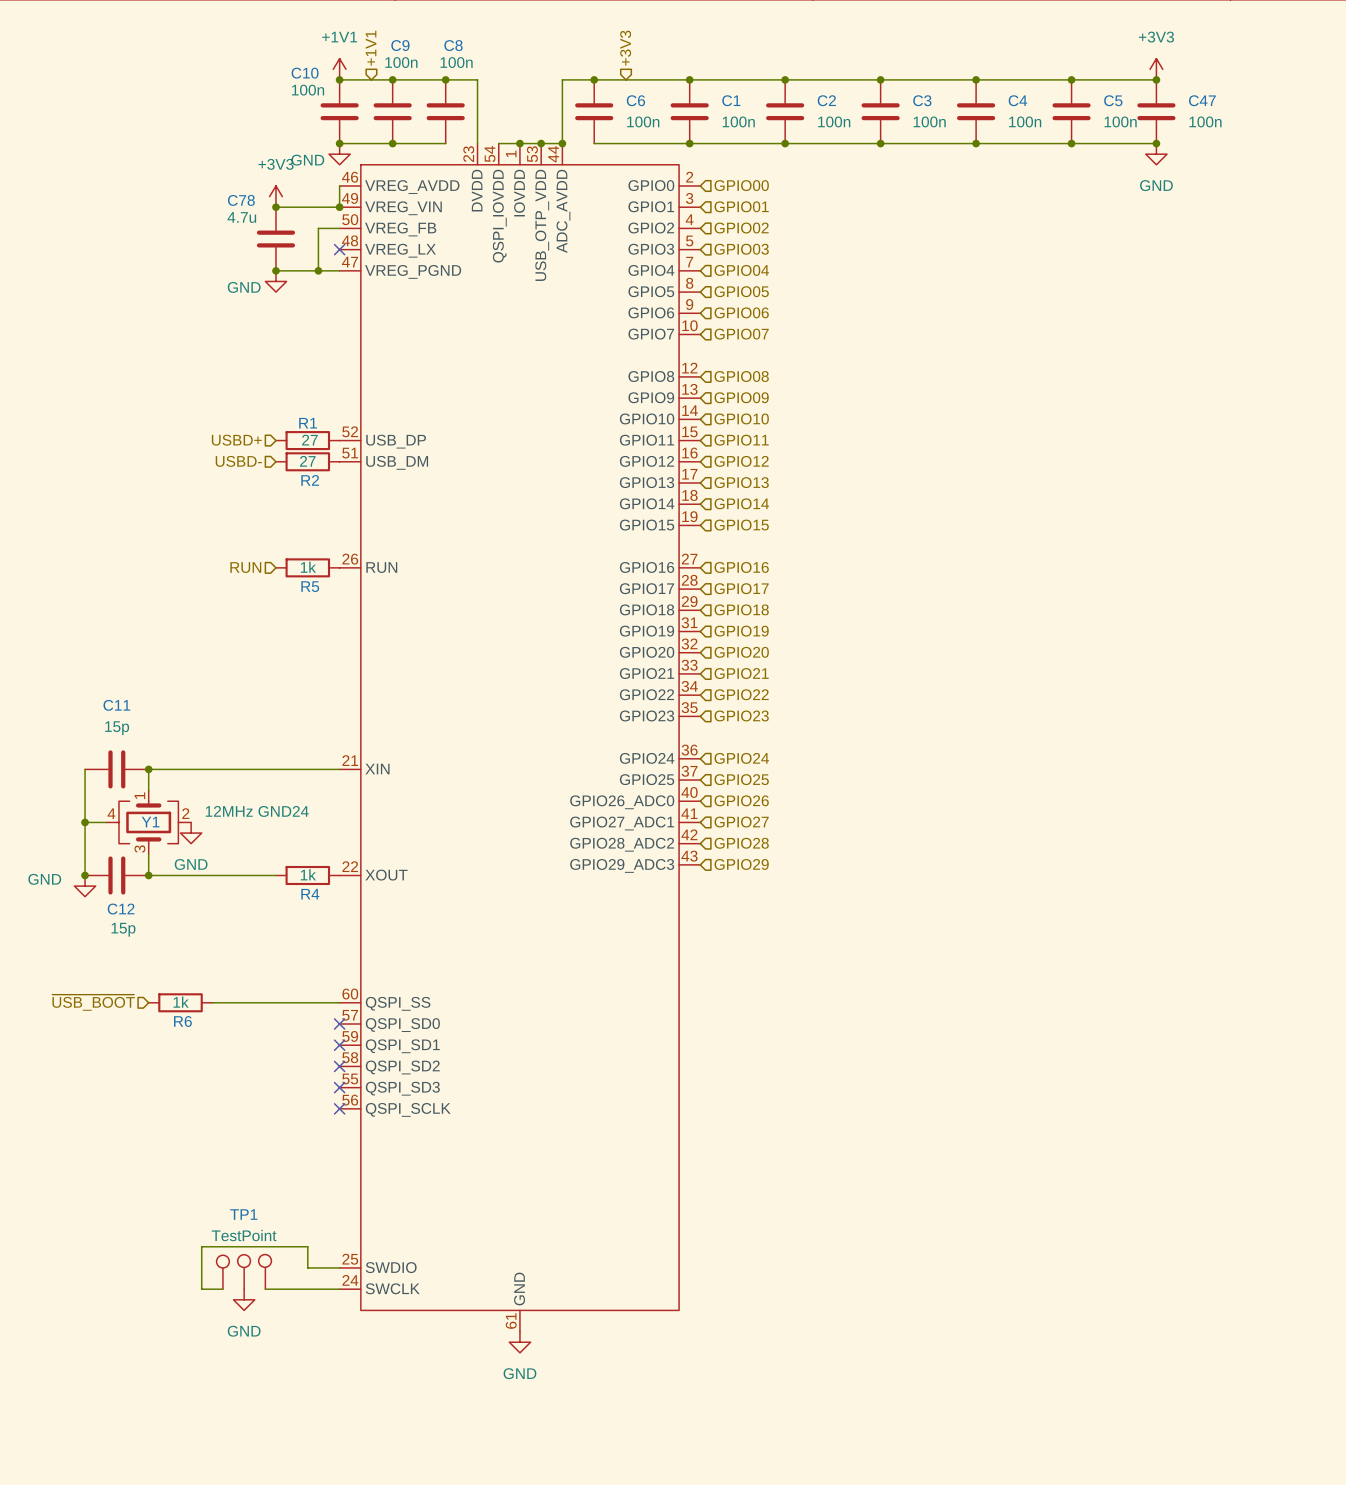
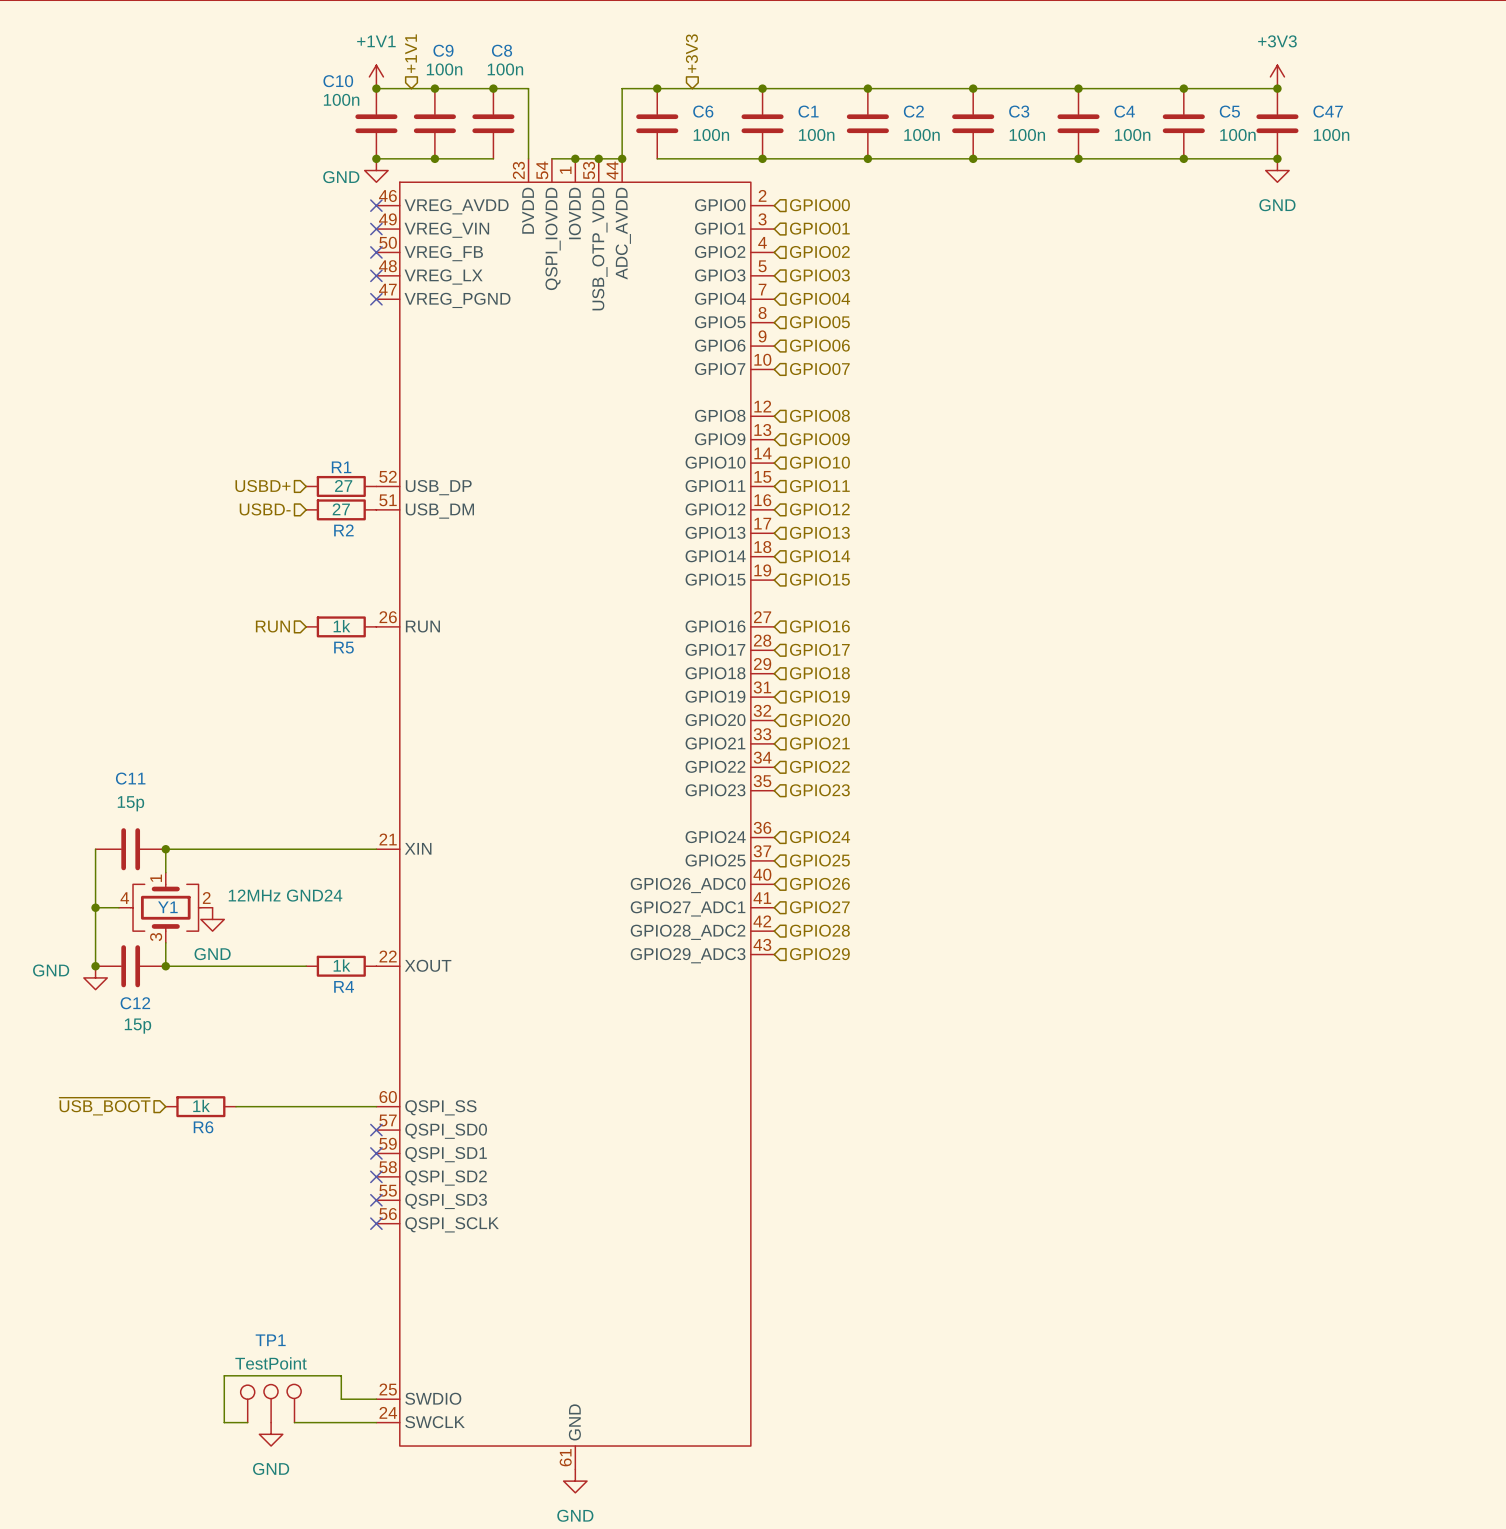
wire: (339, 185) (339, 207) (275, 207) -> none
no-connect mark: none -> (376, 205)
power symbol: +3V3 (275, 196) -> none
junction: (275, 207) -> none
junction: (339, 207) -> none
no-connect mark: none -> (376, 229)
wire: (339, 228) (318, 228) (318, 270) -> none
no-connect mark: none -> (376, 252)
C78: 4.7u (275, 239) -> none
wire: (275, 270) (339, 270) -> none
junction: (275, 270) -> none
junction: (318, 270) -> none
no-connect mark: none -> (376, 299)
power symbol: GND (275, 281) -> none

